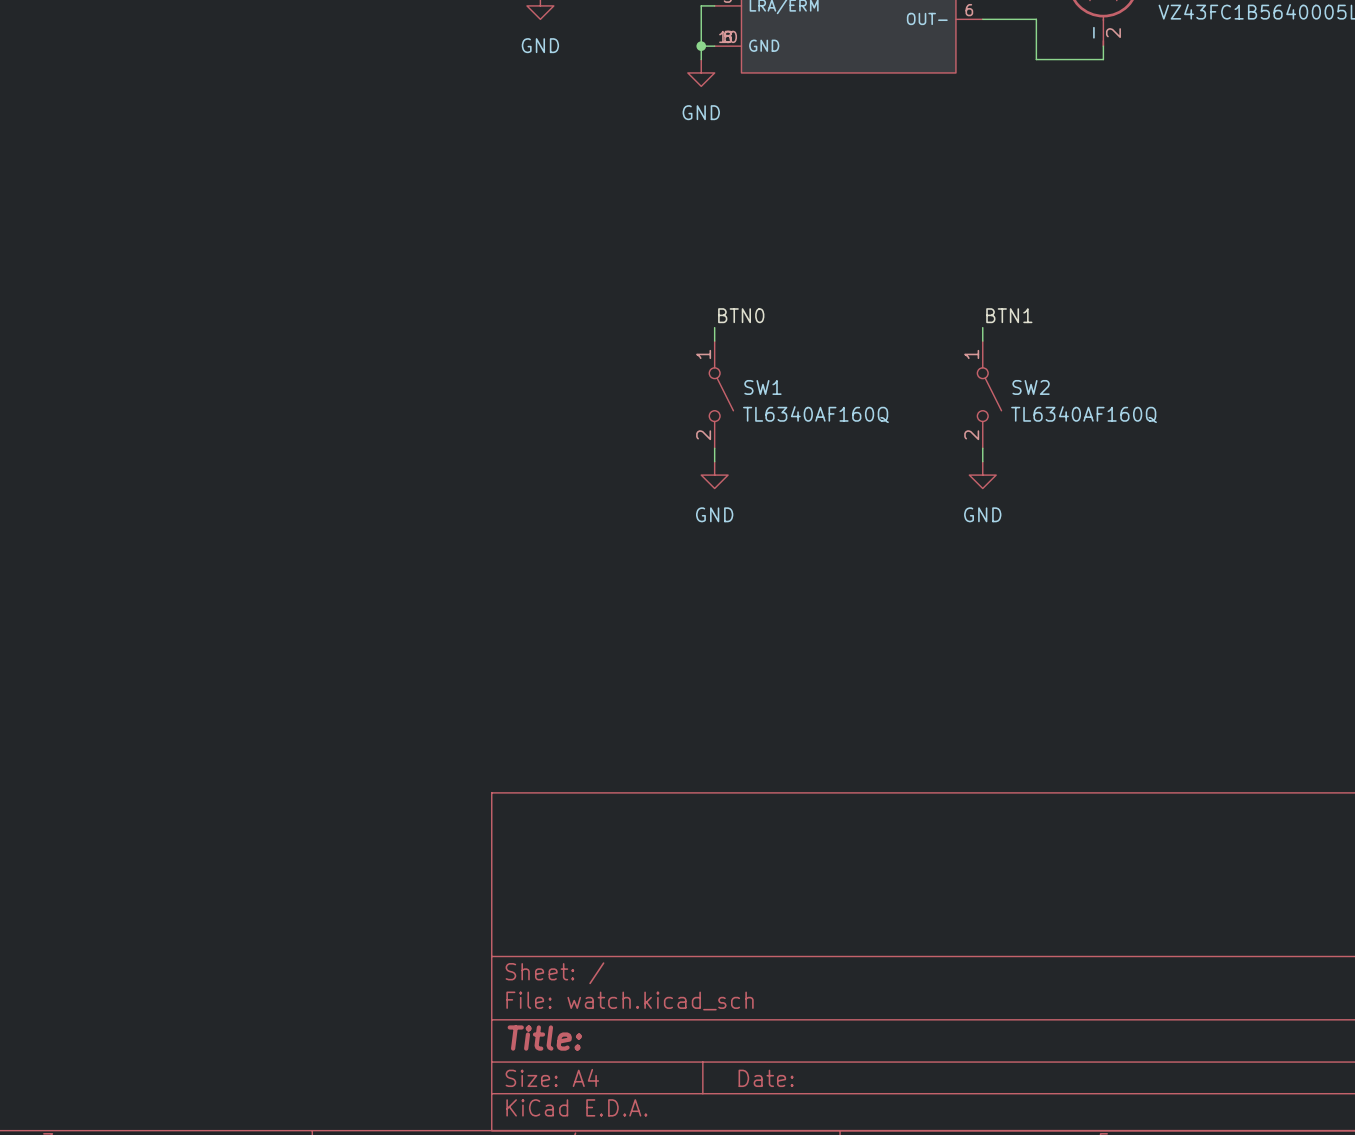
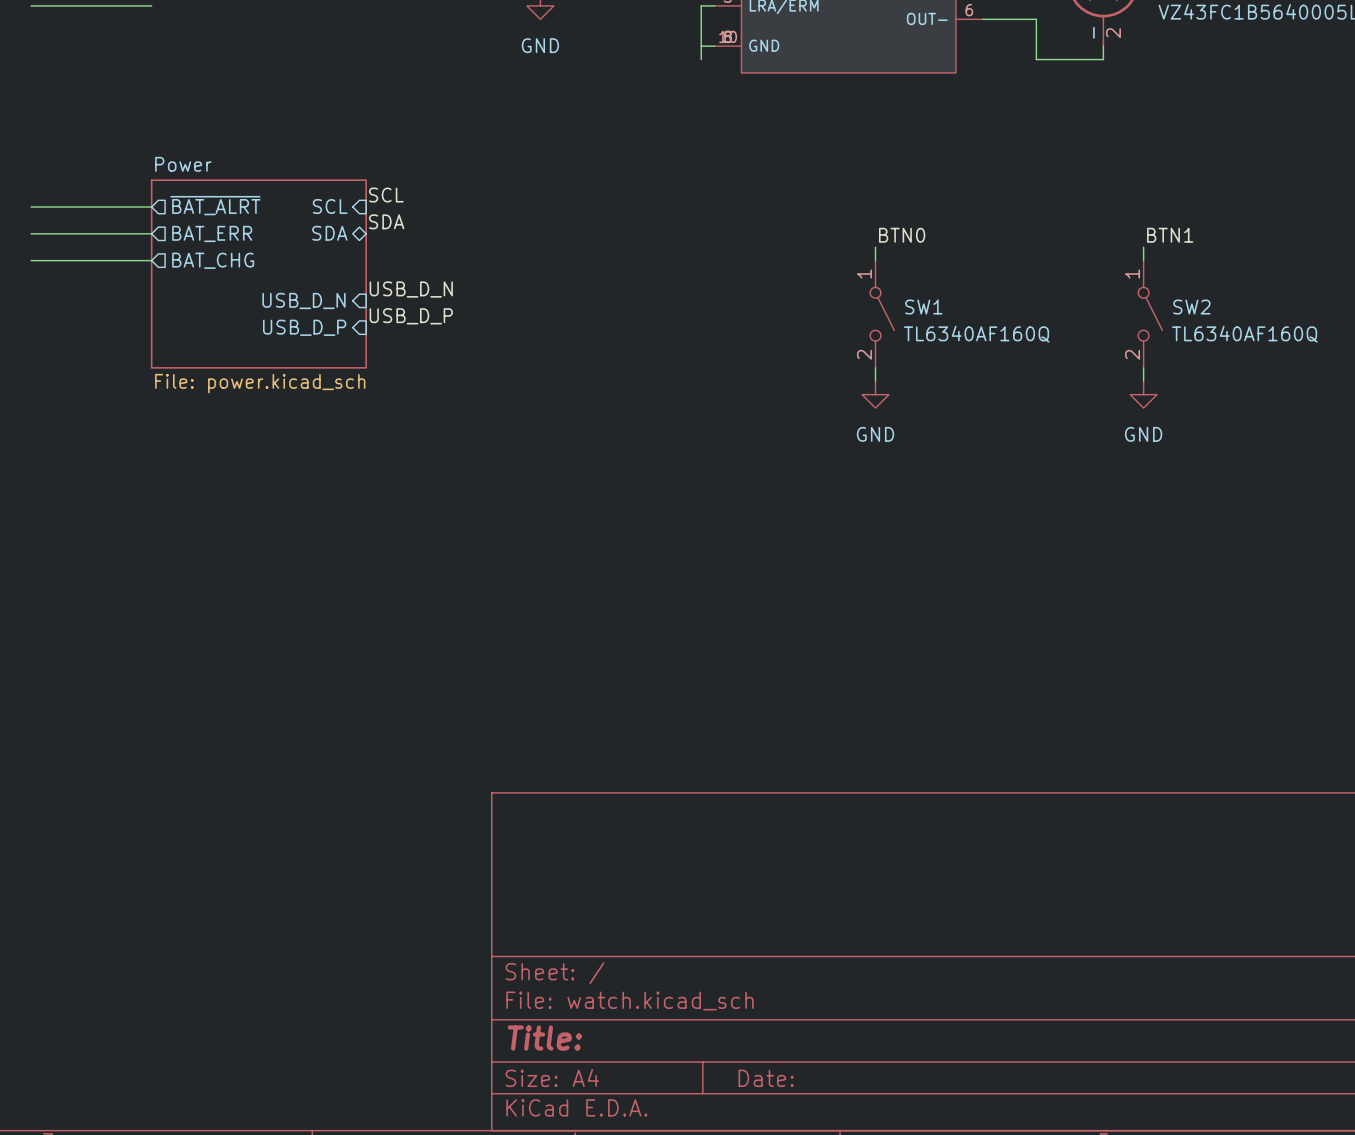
wire: none -> (31, 5) (151, 5)
junction: (701, 46) -> none
power symbol: GND (701, 72) -> none
label: none -> SCL (386, 195)
sheet pin: none -> ~{BAT_ALRT} (215, 205)
sheet pin: none -> SCL (330, 206)
wire: none -> (31, 207) (151, 207)
label: none -> SDA (386, 221)
wire: none -> (31, 233) (151, 233)
sheet pin: none -> BAT_ERR (212, 233)
sheet pin: none -> SDA (329, 233)
wire: none -> (31, 260) (151, 260)
sheet pin: none -> BAT_CHG (213, 260)
sheet Power: none -> File: power.kicad_sch (258, 274)
label: none -> USB_D_N (411, 289)
sheet pin: none -> USB_D_N (304, 300)
label position: BTN0 (741, 315) -> BTN0 (902, 235)
label position: BTN1 (1009, 315) -> BTN1 (1170, 235)
label: none -> USB_D_P (411, 316)
sheet pin: none -> USB_D_P (304, 327)
wire: (714, 327) (714, 341) -> (875, 247) (875, 260)
wire: (982, 327) (982, 341) -> (1143, 247) (1143, 260)
SW1 position: (721, 394) -> (882, 314)
power symbol: none -> GND (875, 394)
SW2 position: (989, 394) -> (1150, 314)
power symbol: none -> GND (1143, 394)
wire: (714, 448) (714, 461) -> (875, 367) (875, 381)
wire: (982, 448) (982, 461) -> (1143, 367) (1143, 381)
power symbol: GND (714, 475) -> none
power symbol: GND (982, 475) -> none

